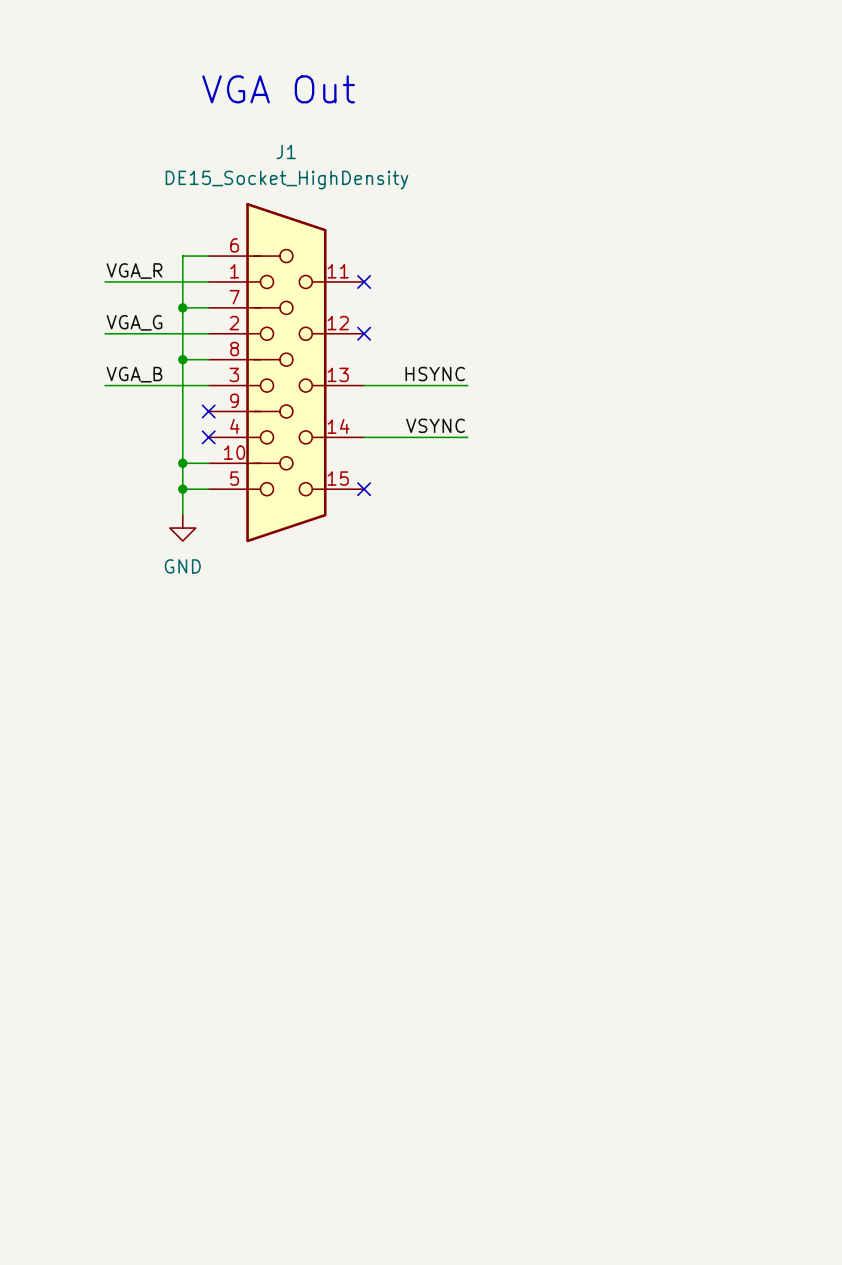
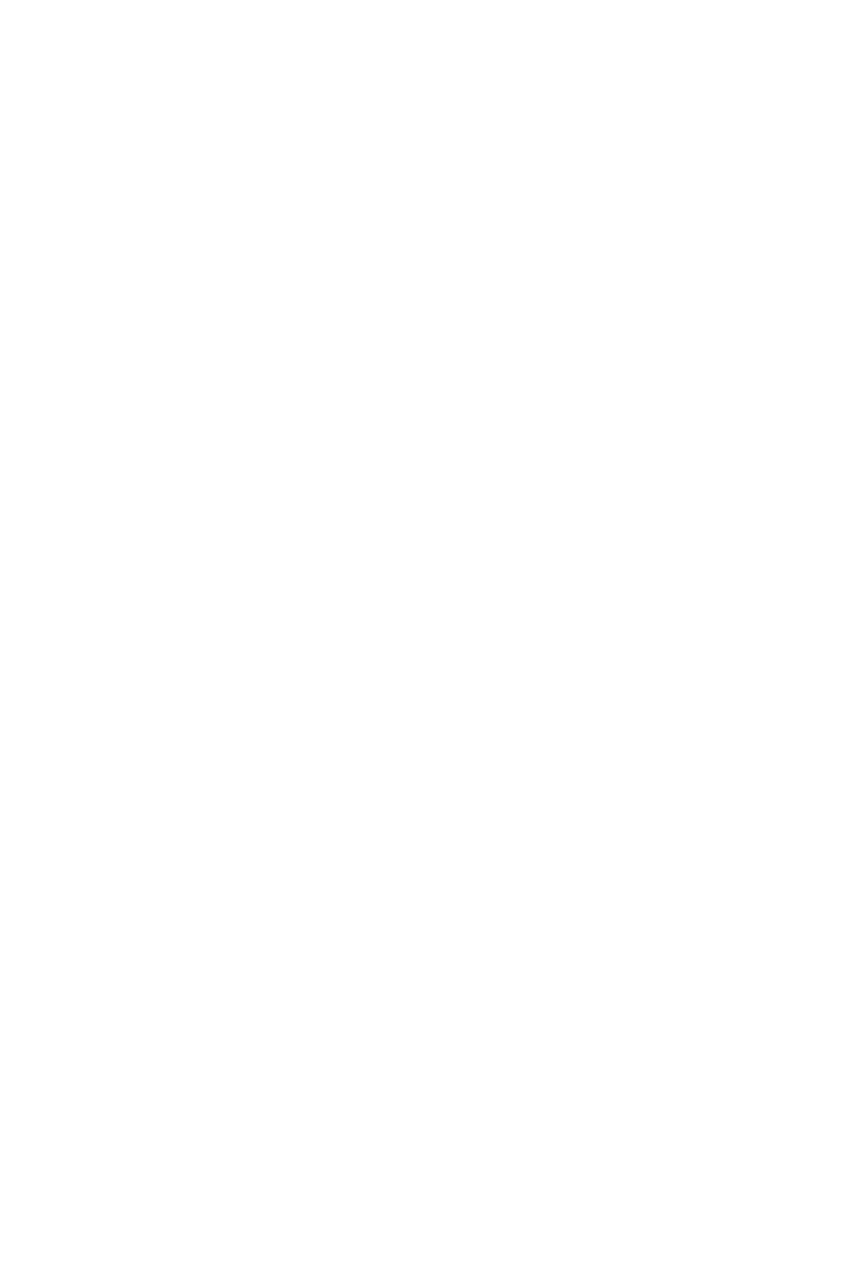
text: VGA Out (278, 89) -> none
wire: (208, 256) (182, 256) (182, 515) -> none
label: VGA_R (134, 271) -> none
wire: (105, 281) (208, 281) -> none
no-connect mark: (364, 281) -> none
wire: (182, 307) (208, 307) -> none
junction: (182, 307) -> none
label: VGA_G (134, 322) -> none
wire: (105, 333) (208, 333) -> none
no-connect mark: (364, 333) -> none
wire: (182, 359) (208, 359) -> none
junction: (182, 359) -> none
J1: DE15_Socket_HighDensity (286, 372) -> none
label: VGA_B (134, 374) -> none
label: HSYNC (435, 374) -> none
wire: (105, 385) (208, 385) -> none
wire: (364, 385) (467, 385) -> none
no-connect mark: (208, 411) -> none
label: VSYNC (435, 425) -> none
no-connect mark: (208, 437) -> none
wire: (364, 437) (467, 437) -> none
wire: (182, 463) (208, 463) -> none
junction: (182, 463) -> none
wire: (182, 489) (208, 489) -> none
junction: (182, 489) -> none
no-connect mark: (364, 489) -> none
power symbol: GND (182, 528) -> none

